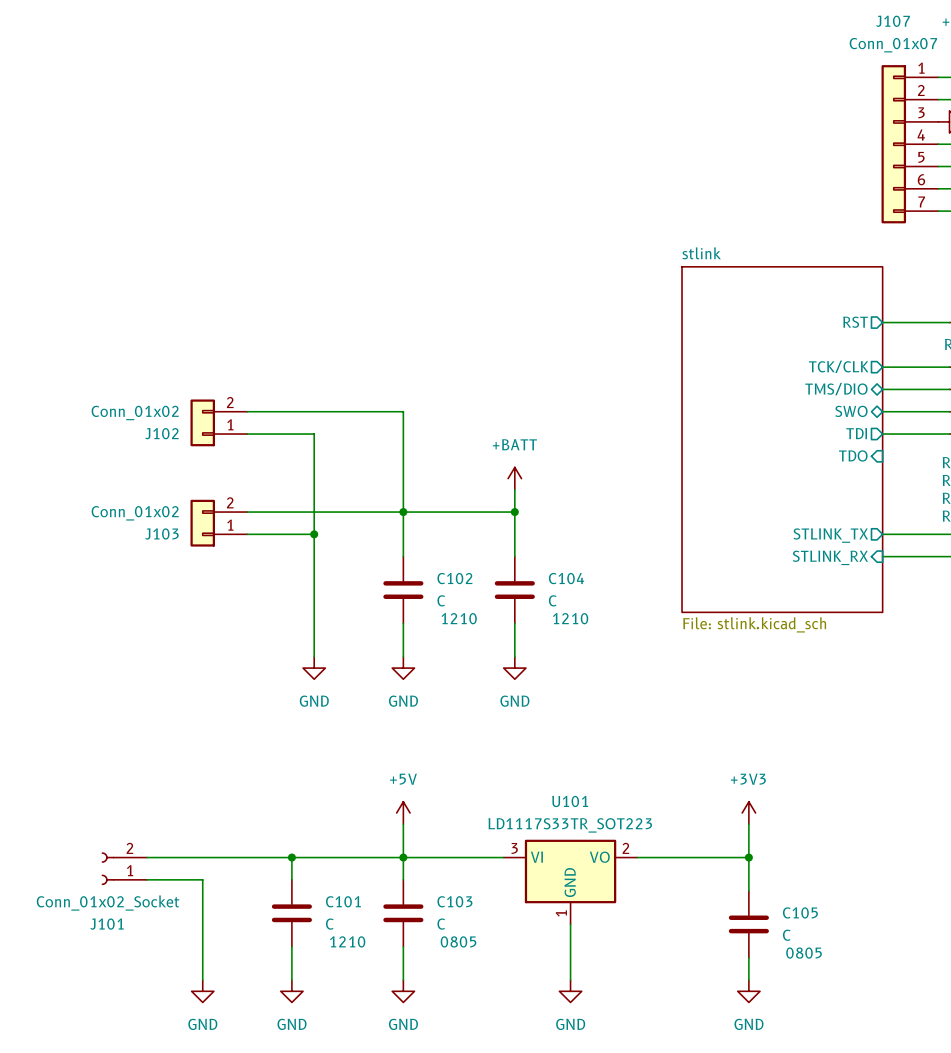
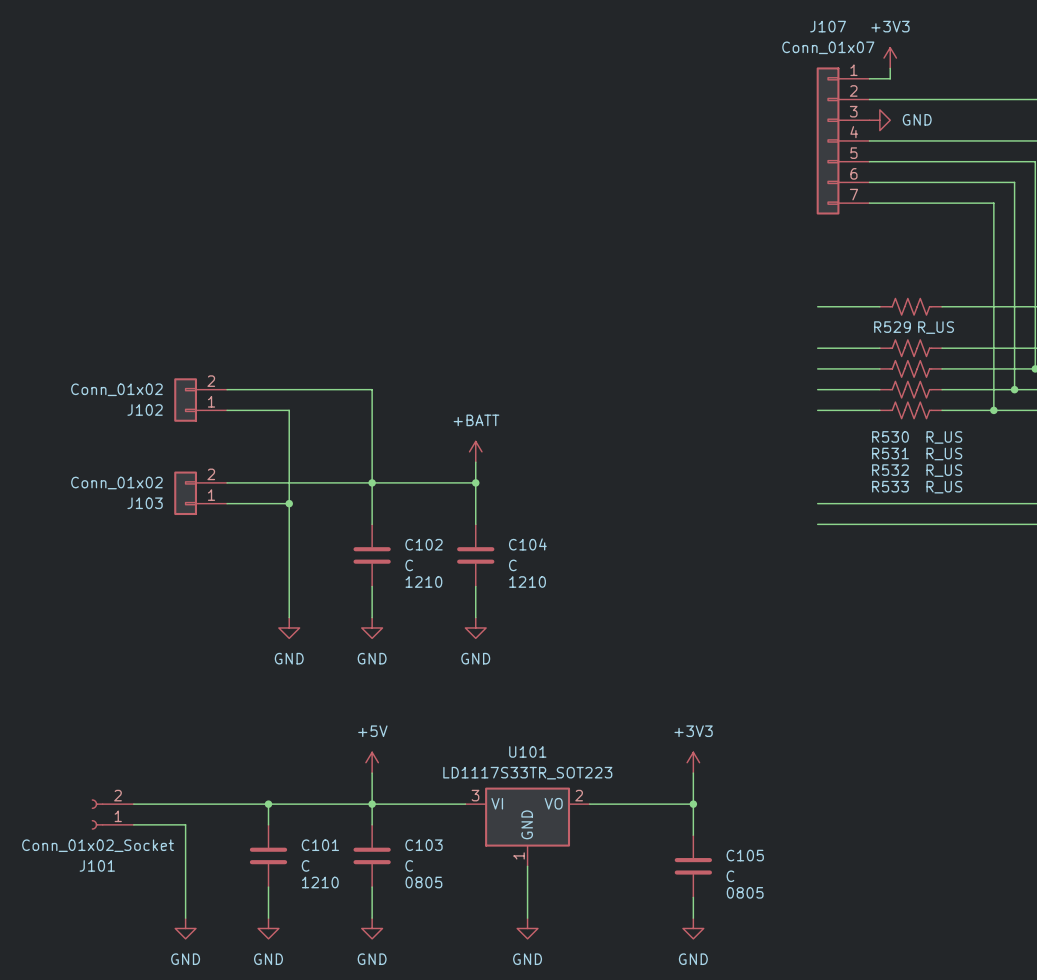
sheet pin: RST (855, 322) -> none
sheet pin: TCK/CLK (838, 366) -> none
sheet pin: TMS/DIO (836, 389) -> none
sheet pin: SWO (851, 411) -> none
sheet pin: TDI (856, 433) -> none
sheet stlink: File: stlink.kicad_sch (782, 439) -> none
sheet pin: TDO (853, 455) -> none
sheet pin: STLINK_TX (830, 535) -> none
sheet pin: STLINK_RX (830, 557) -> none

